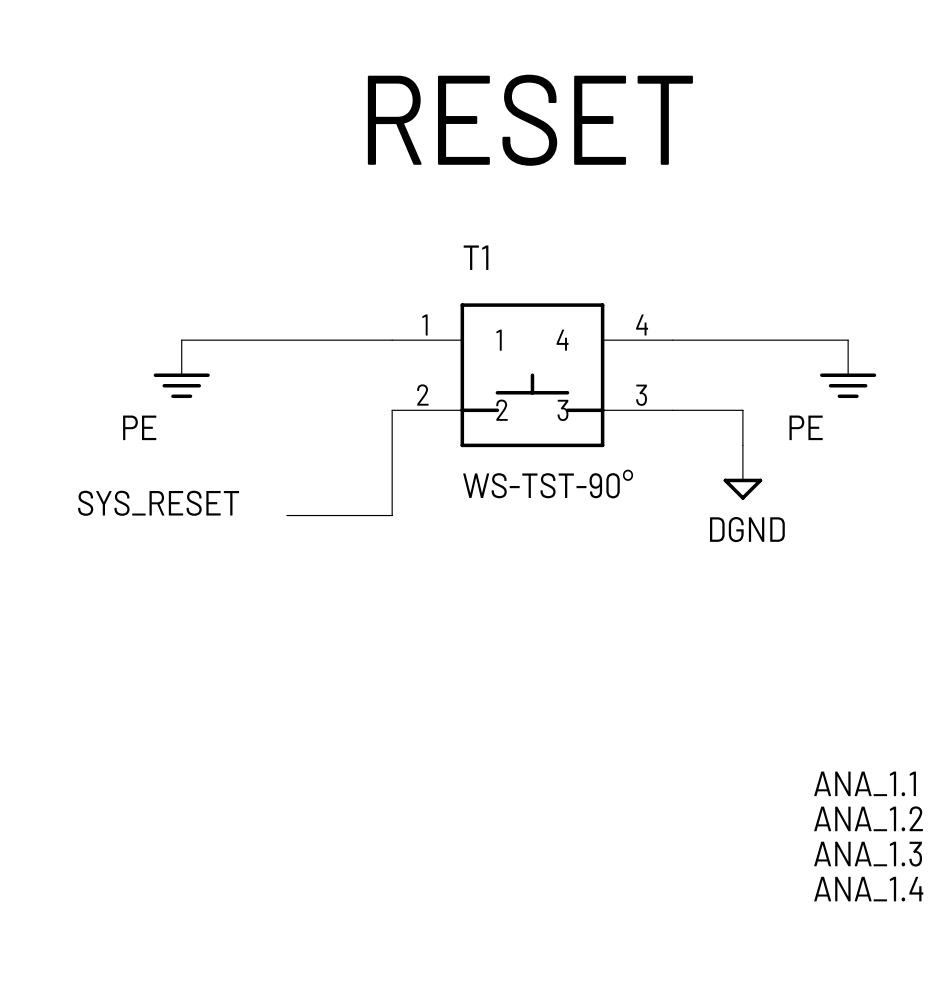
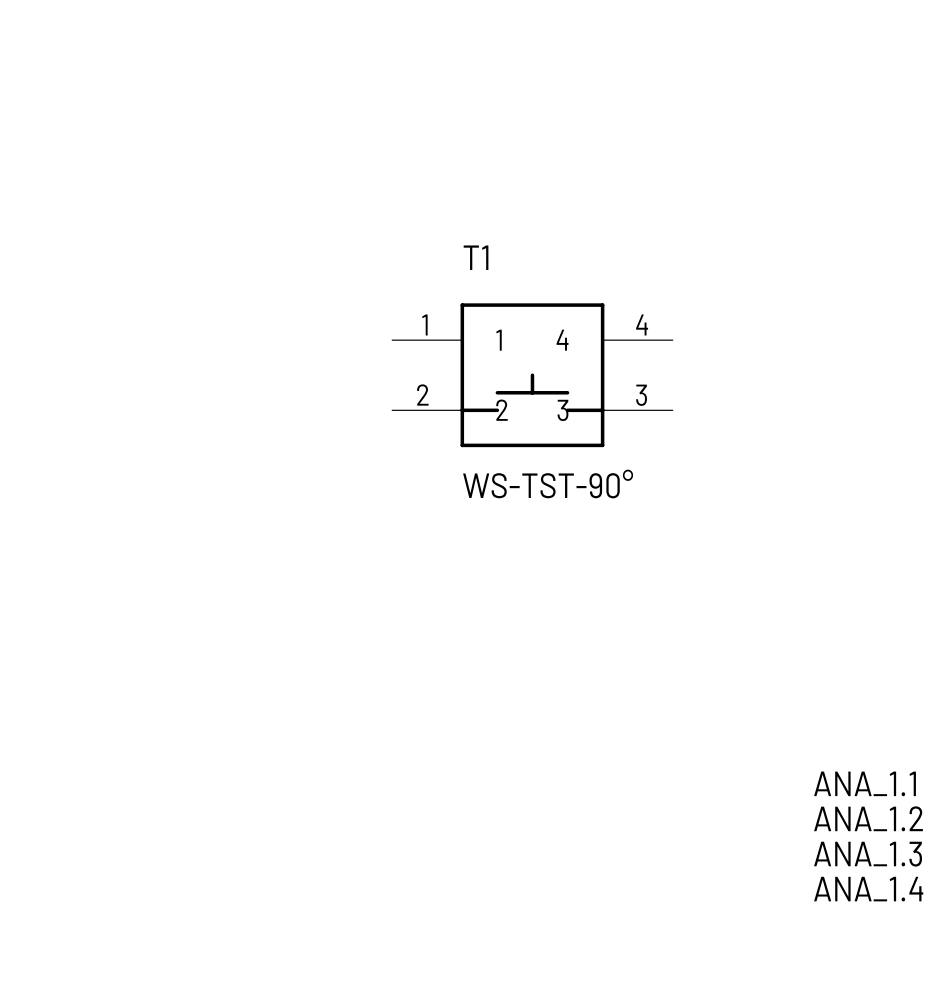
text: RESET (530, 120) -> none
wire: (181, 340) (392, 340) -> none
wire: (672, 340) (848, 340) -> none
power symbol: PE (181, 369) -> none
power symbol: PE (848, 369) -> none
wire: (392, 410) (392, 515) (286, 515) -> none
wire: (672, 410) (742, 410) (742, 445) -> none
power symbol: DGND (742, 472) -> none
label: SYS_RESET (158, 503) -> none

